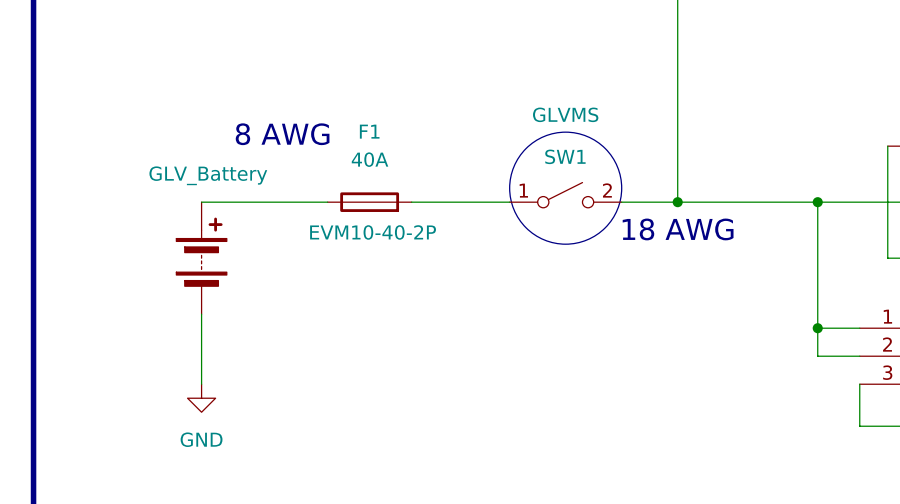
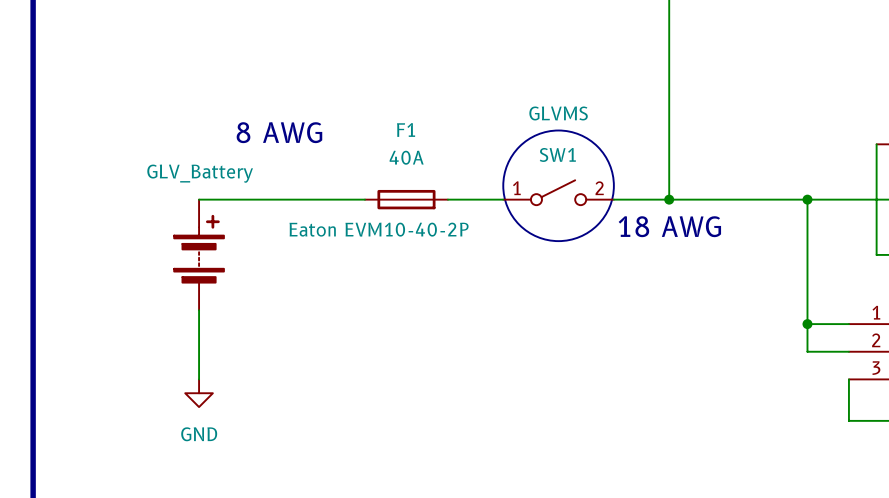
F1 position: (369, 202) -> (406, 199)
F1 text: EVM10-40-2P (373, 232) -> Eaton EVM10-40-2P (379, 229)

